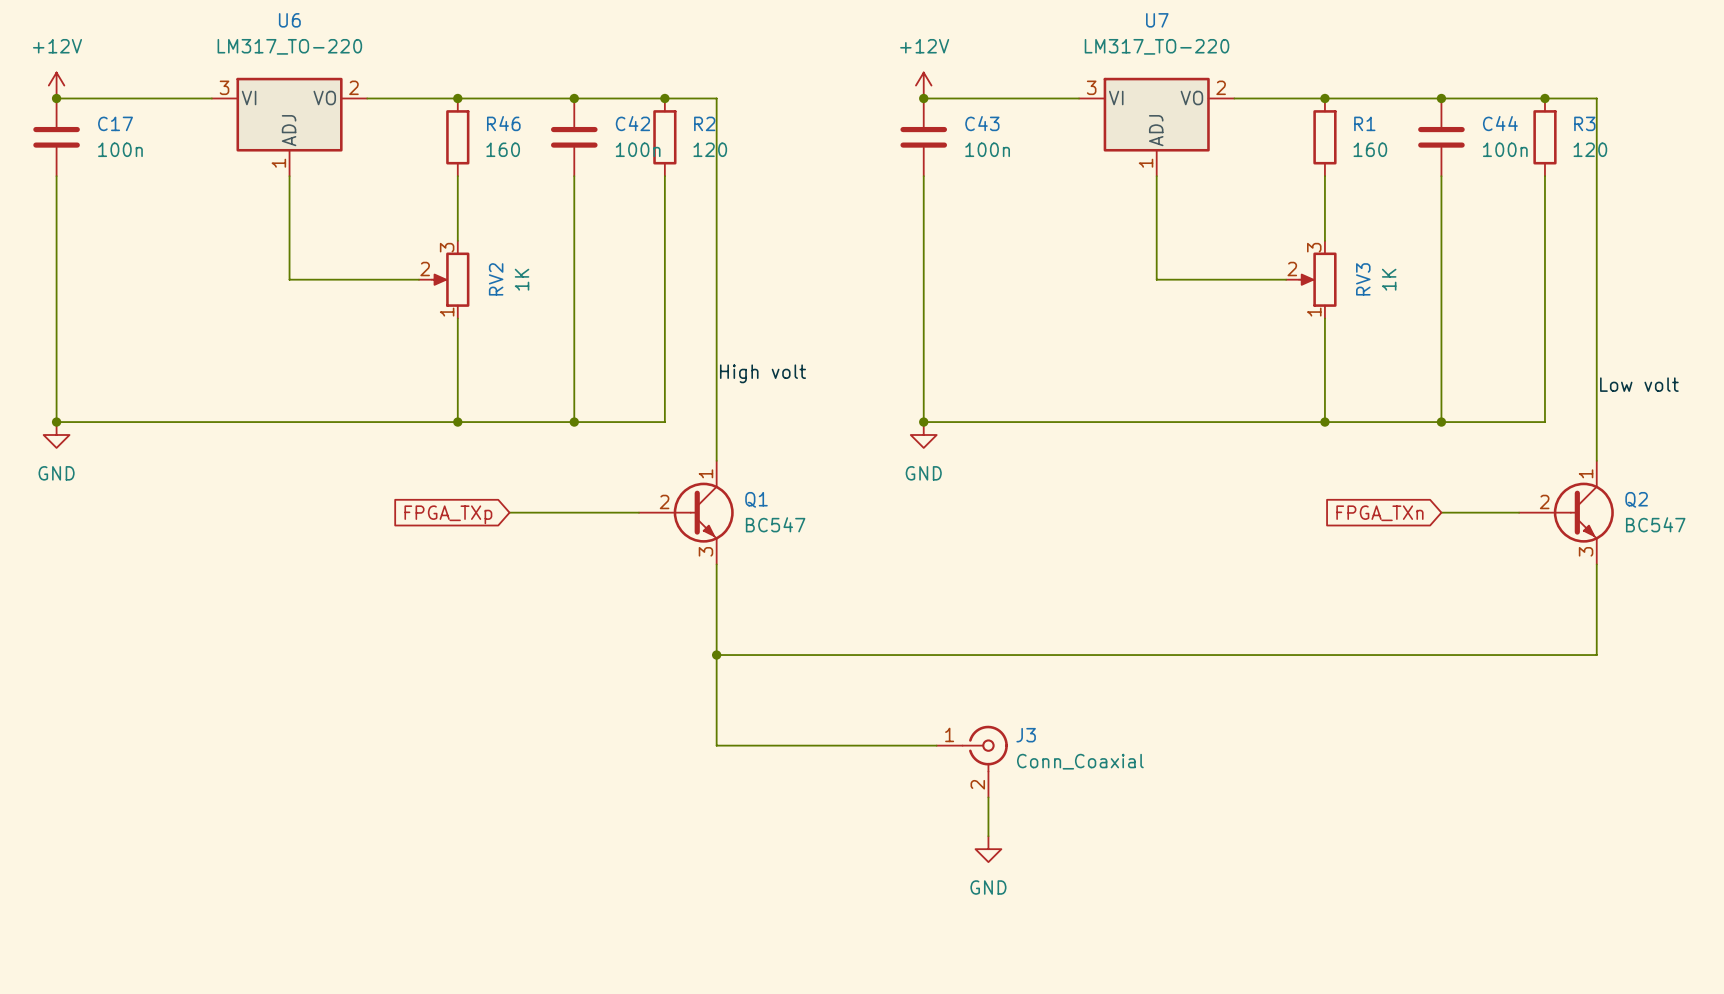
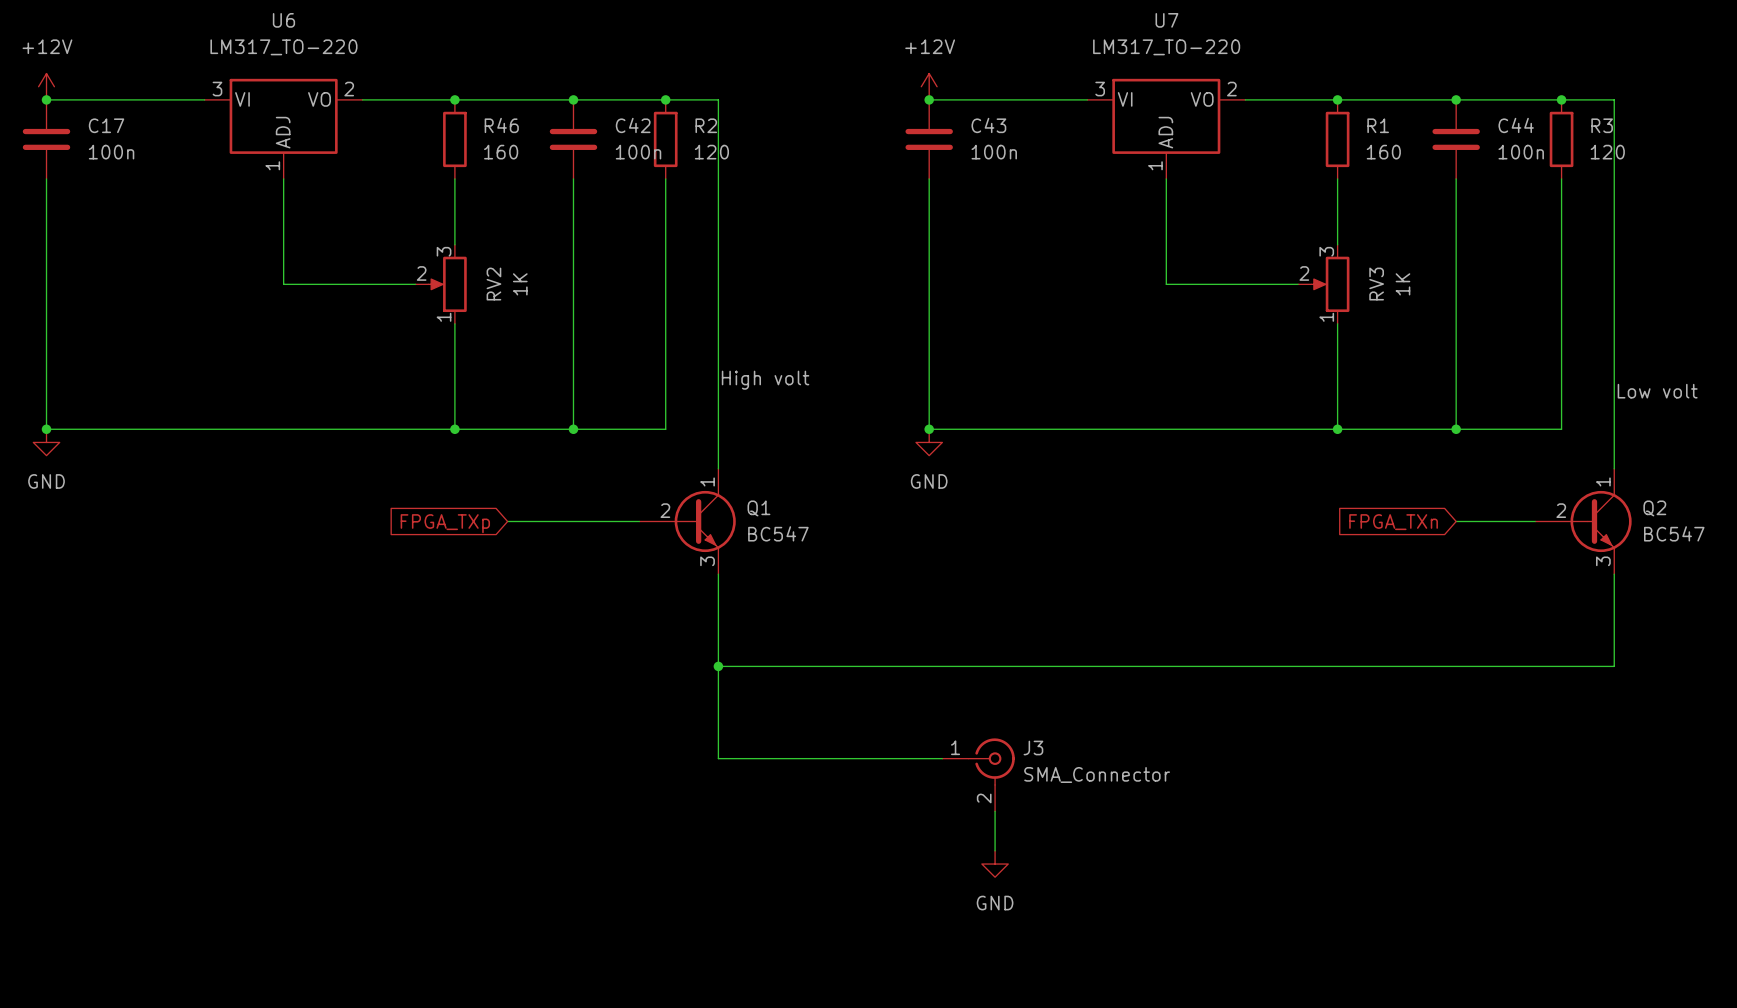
J3 value: Conn_Coaxial (1080, 761) -> SMA_Connector (1097, 774)

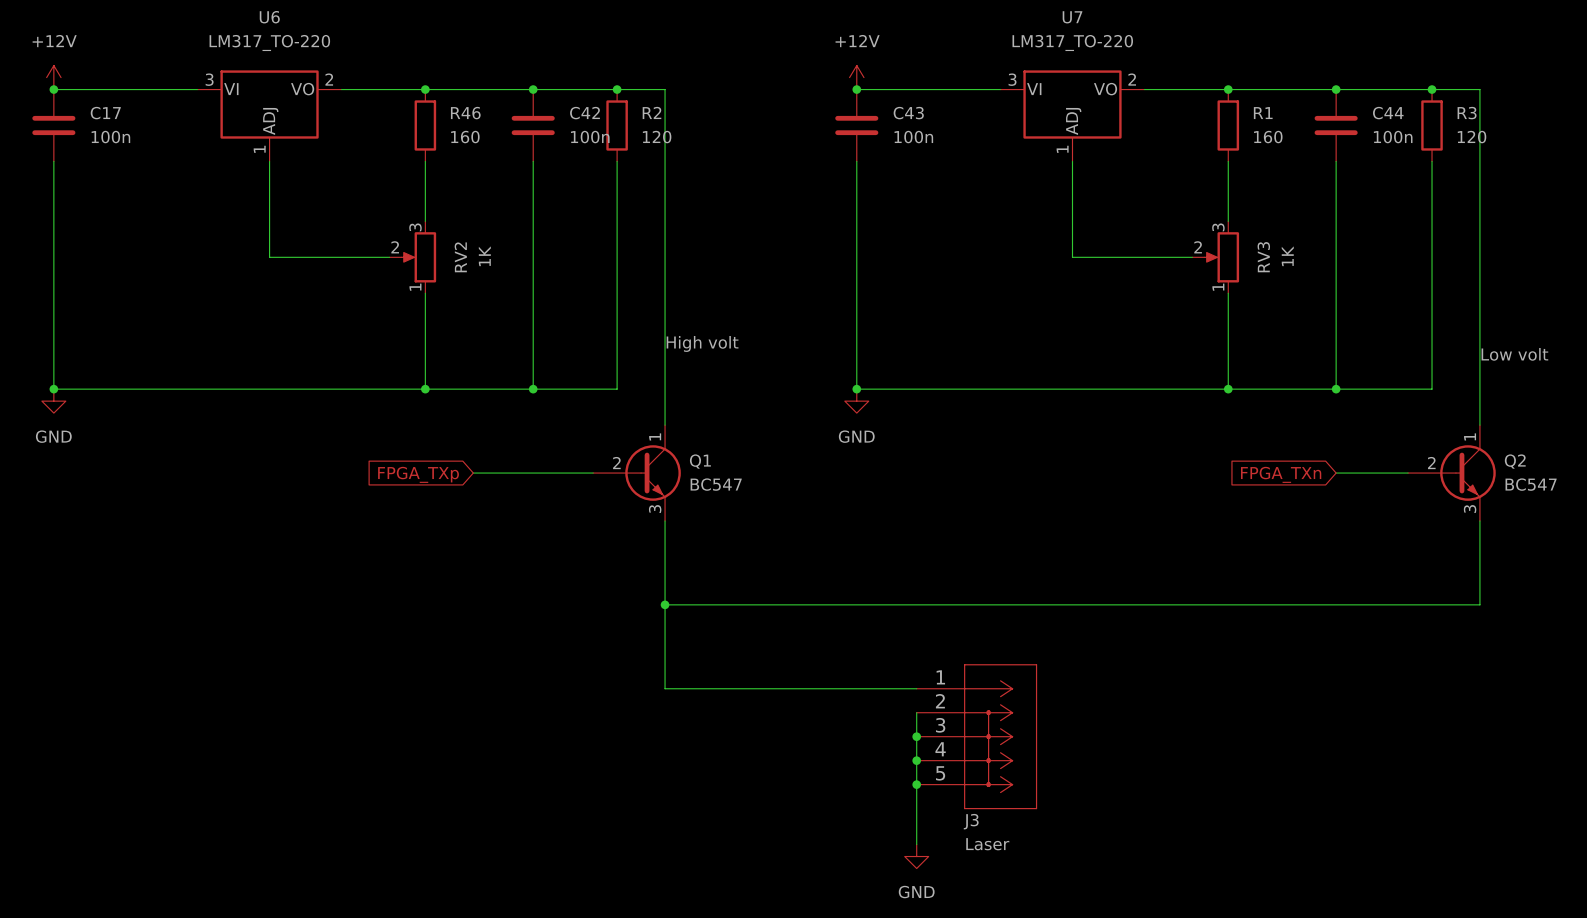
J3 symbol: [942, 738, 1015, 812] -> [916, 664, 1038, 810]
J3 name position: J3 (1033, 748) -> J3 (971, 821)
J3 value: SMA_Connector (1097, 774) -> Laser (987, 844)
junction: none -> (916, 736)
junction: none -> (916, 760)
wire: none -> (916, 772) (916, 844)
power symbol position: GND (995, 864) -> GND (916, 856)
junction: none -> (916, 784)

